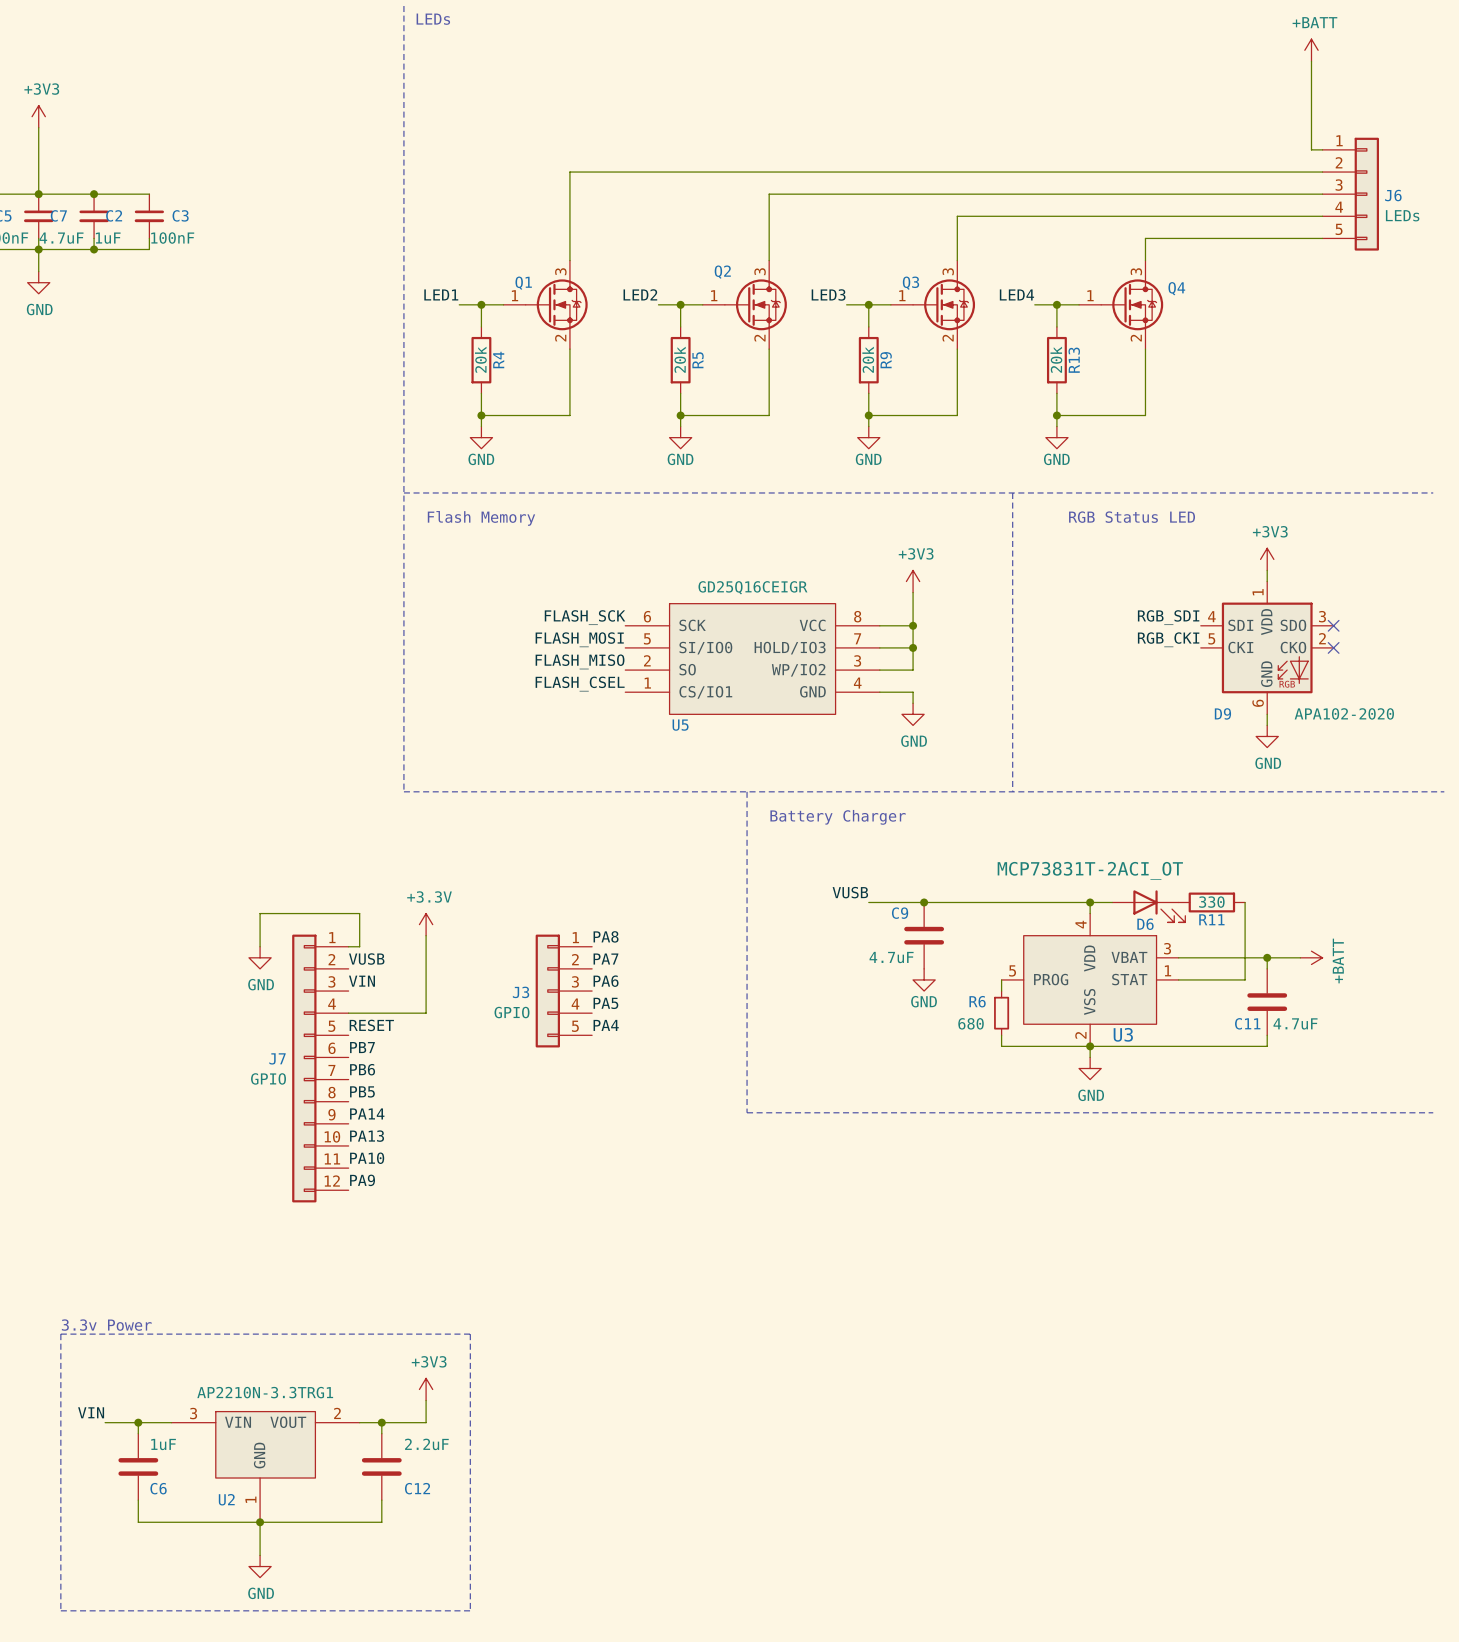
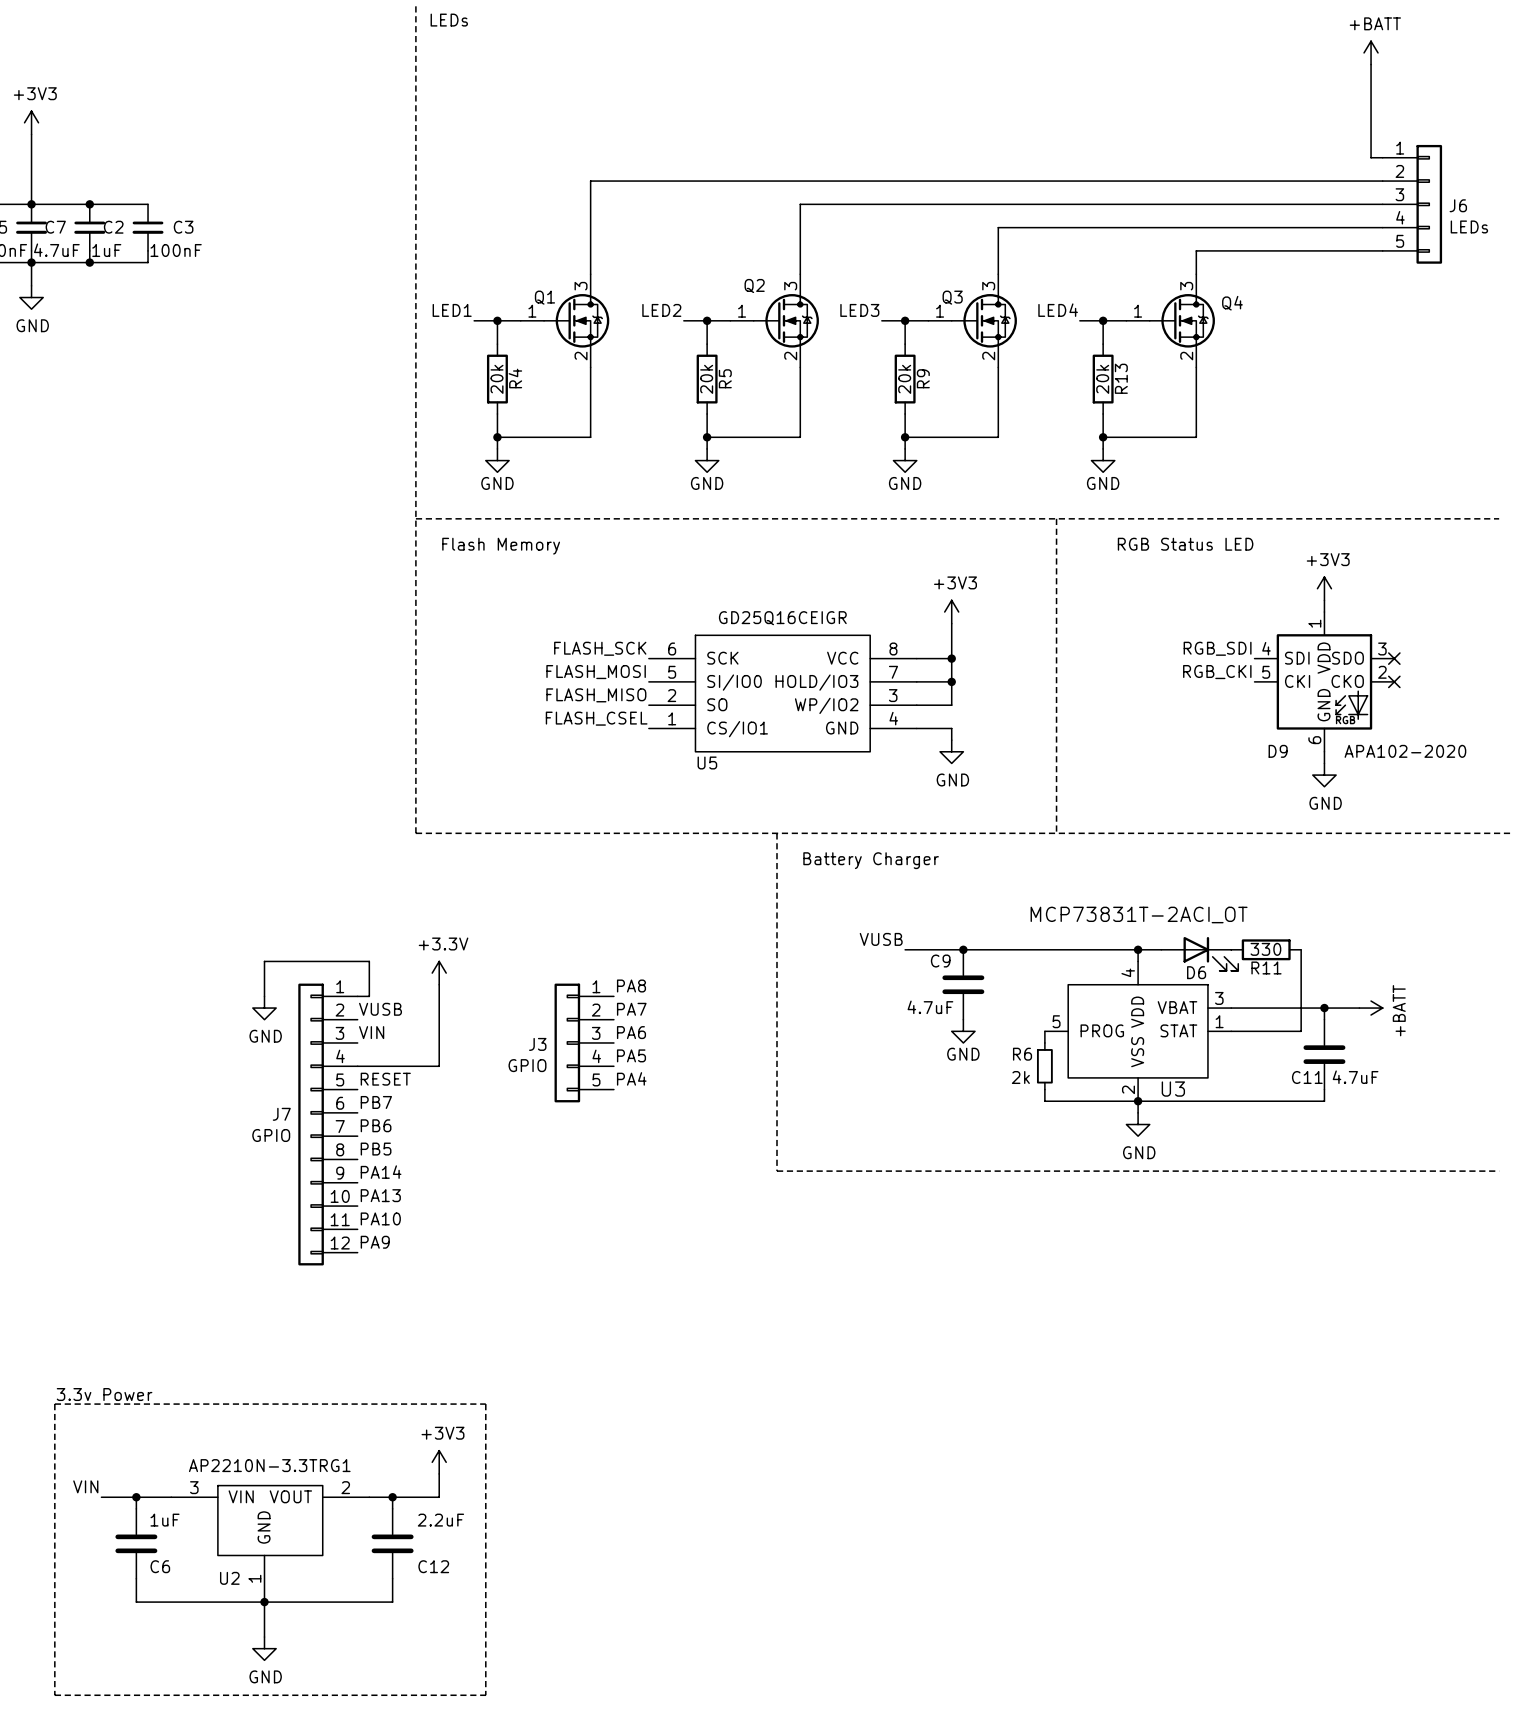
R6 value: 680 (971, 1023) -> 2k (1020, 1077)

